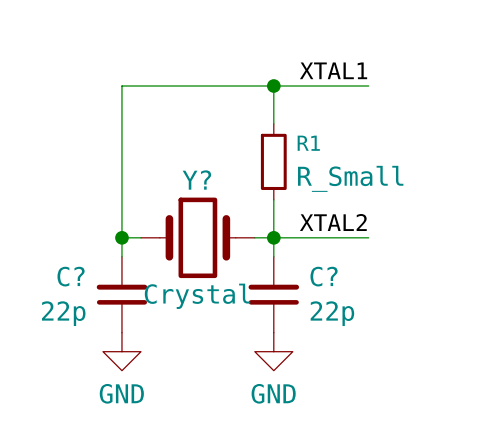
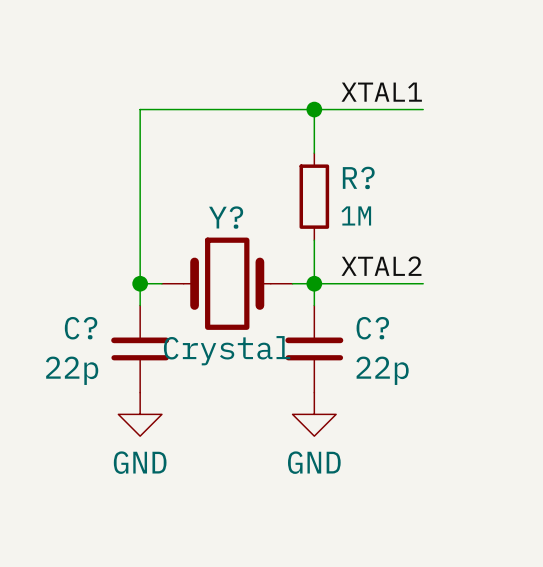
R1 name: R1 (308, 143) -> R? (358, 177)
R1 value: R_Small (350, 178) -> 1M (356, 215)

